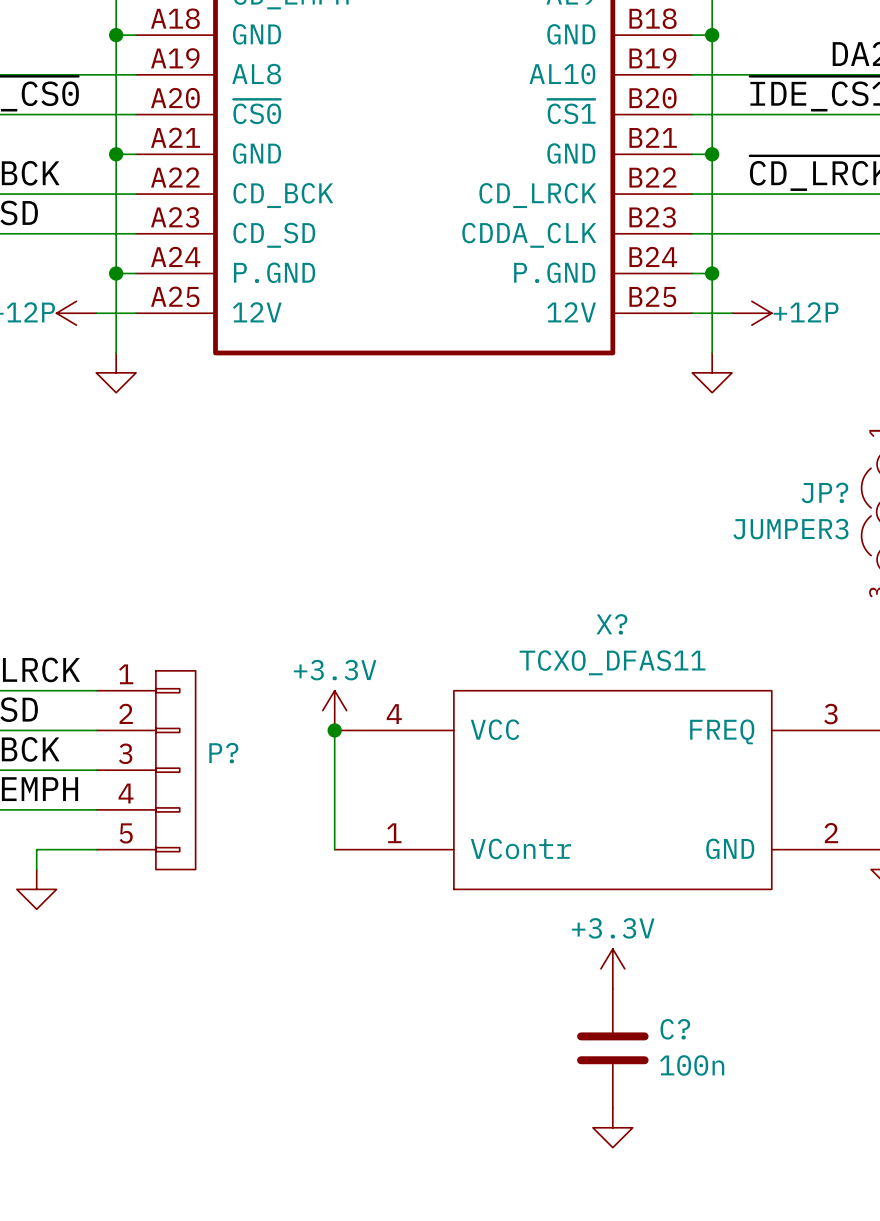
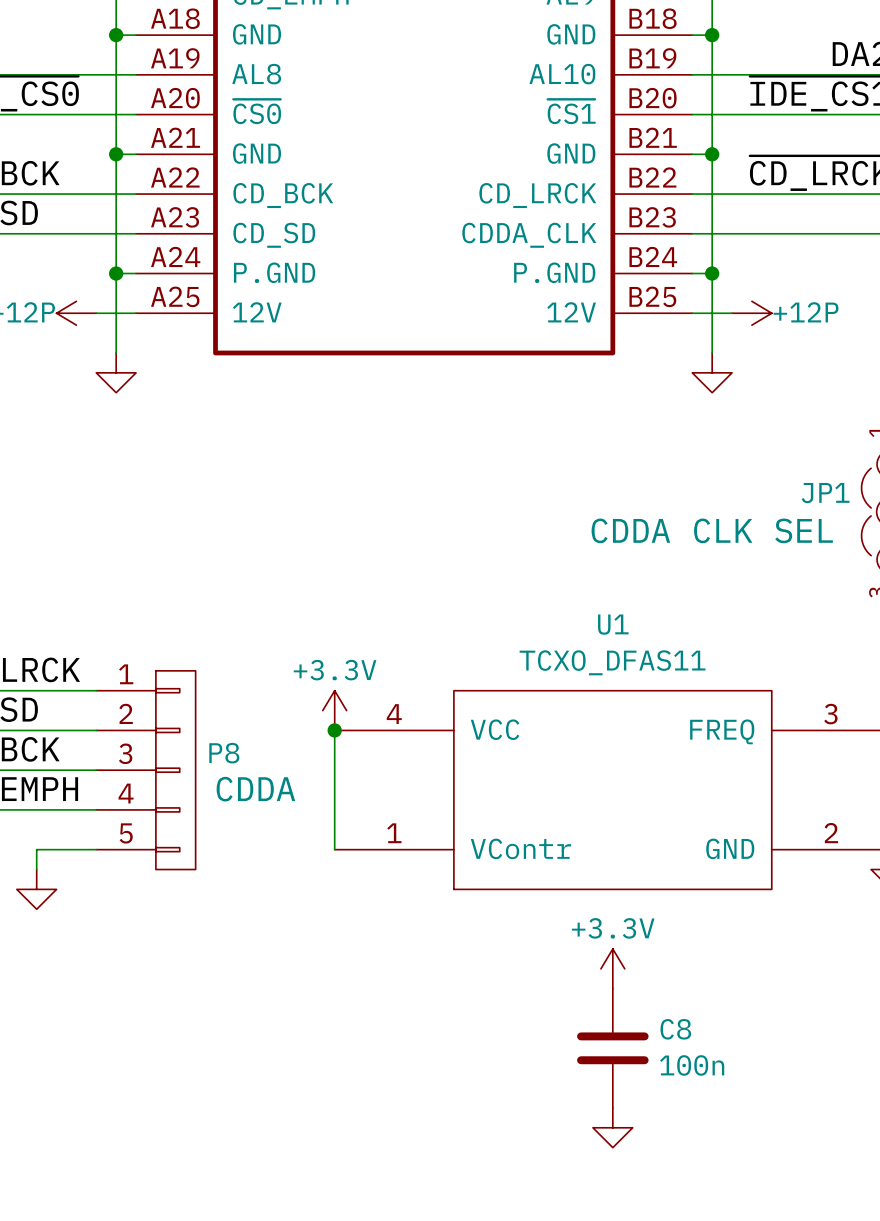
JP? name: JP? (824, 492) -> JP1 (825, 493)
JP? value: JUMPER3 (790, 529) -> none
JP? text: none -> CDDA CLK SEL (712, 530)
X? name: X? (611, 624) -> U1 (613, 624)
P? name: P? (223, 753) -> P8 (224, 753)
P? text: none -> CDDA (255, 789)
C? name: C? (675, 1029) -> C8 (675, 1029)

